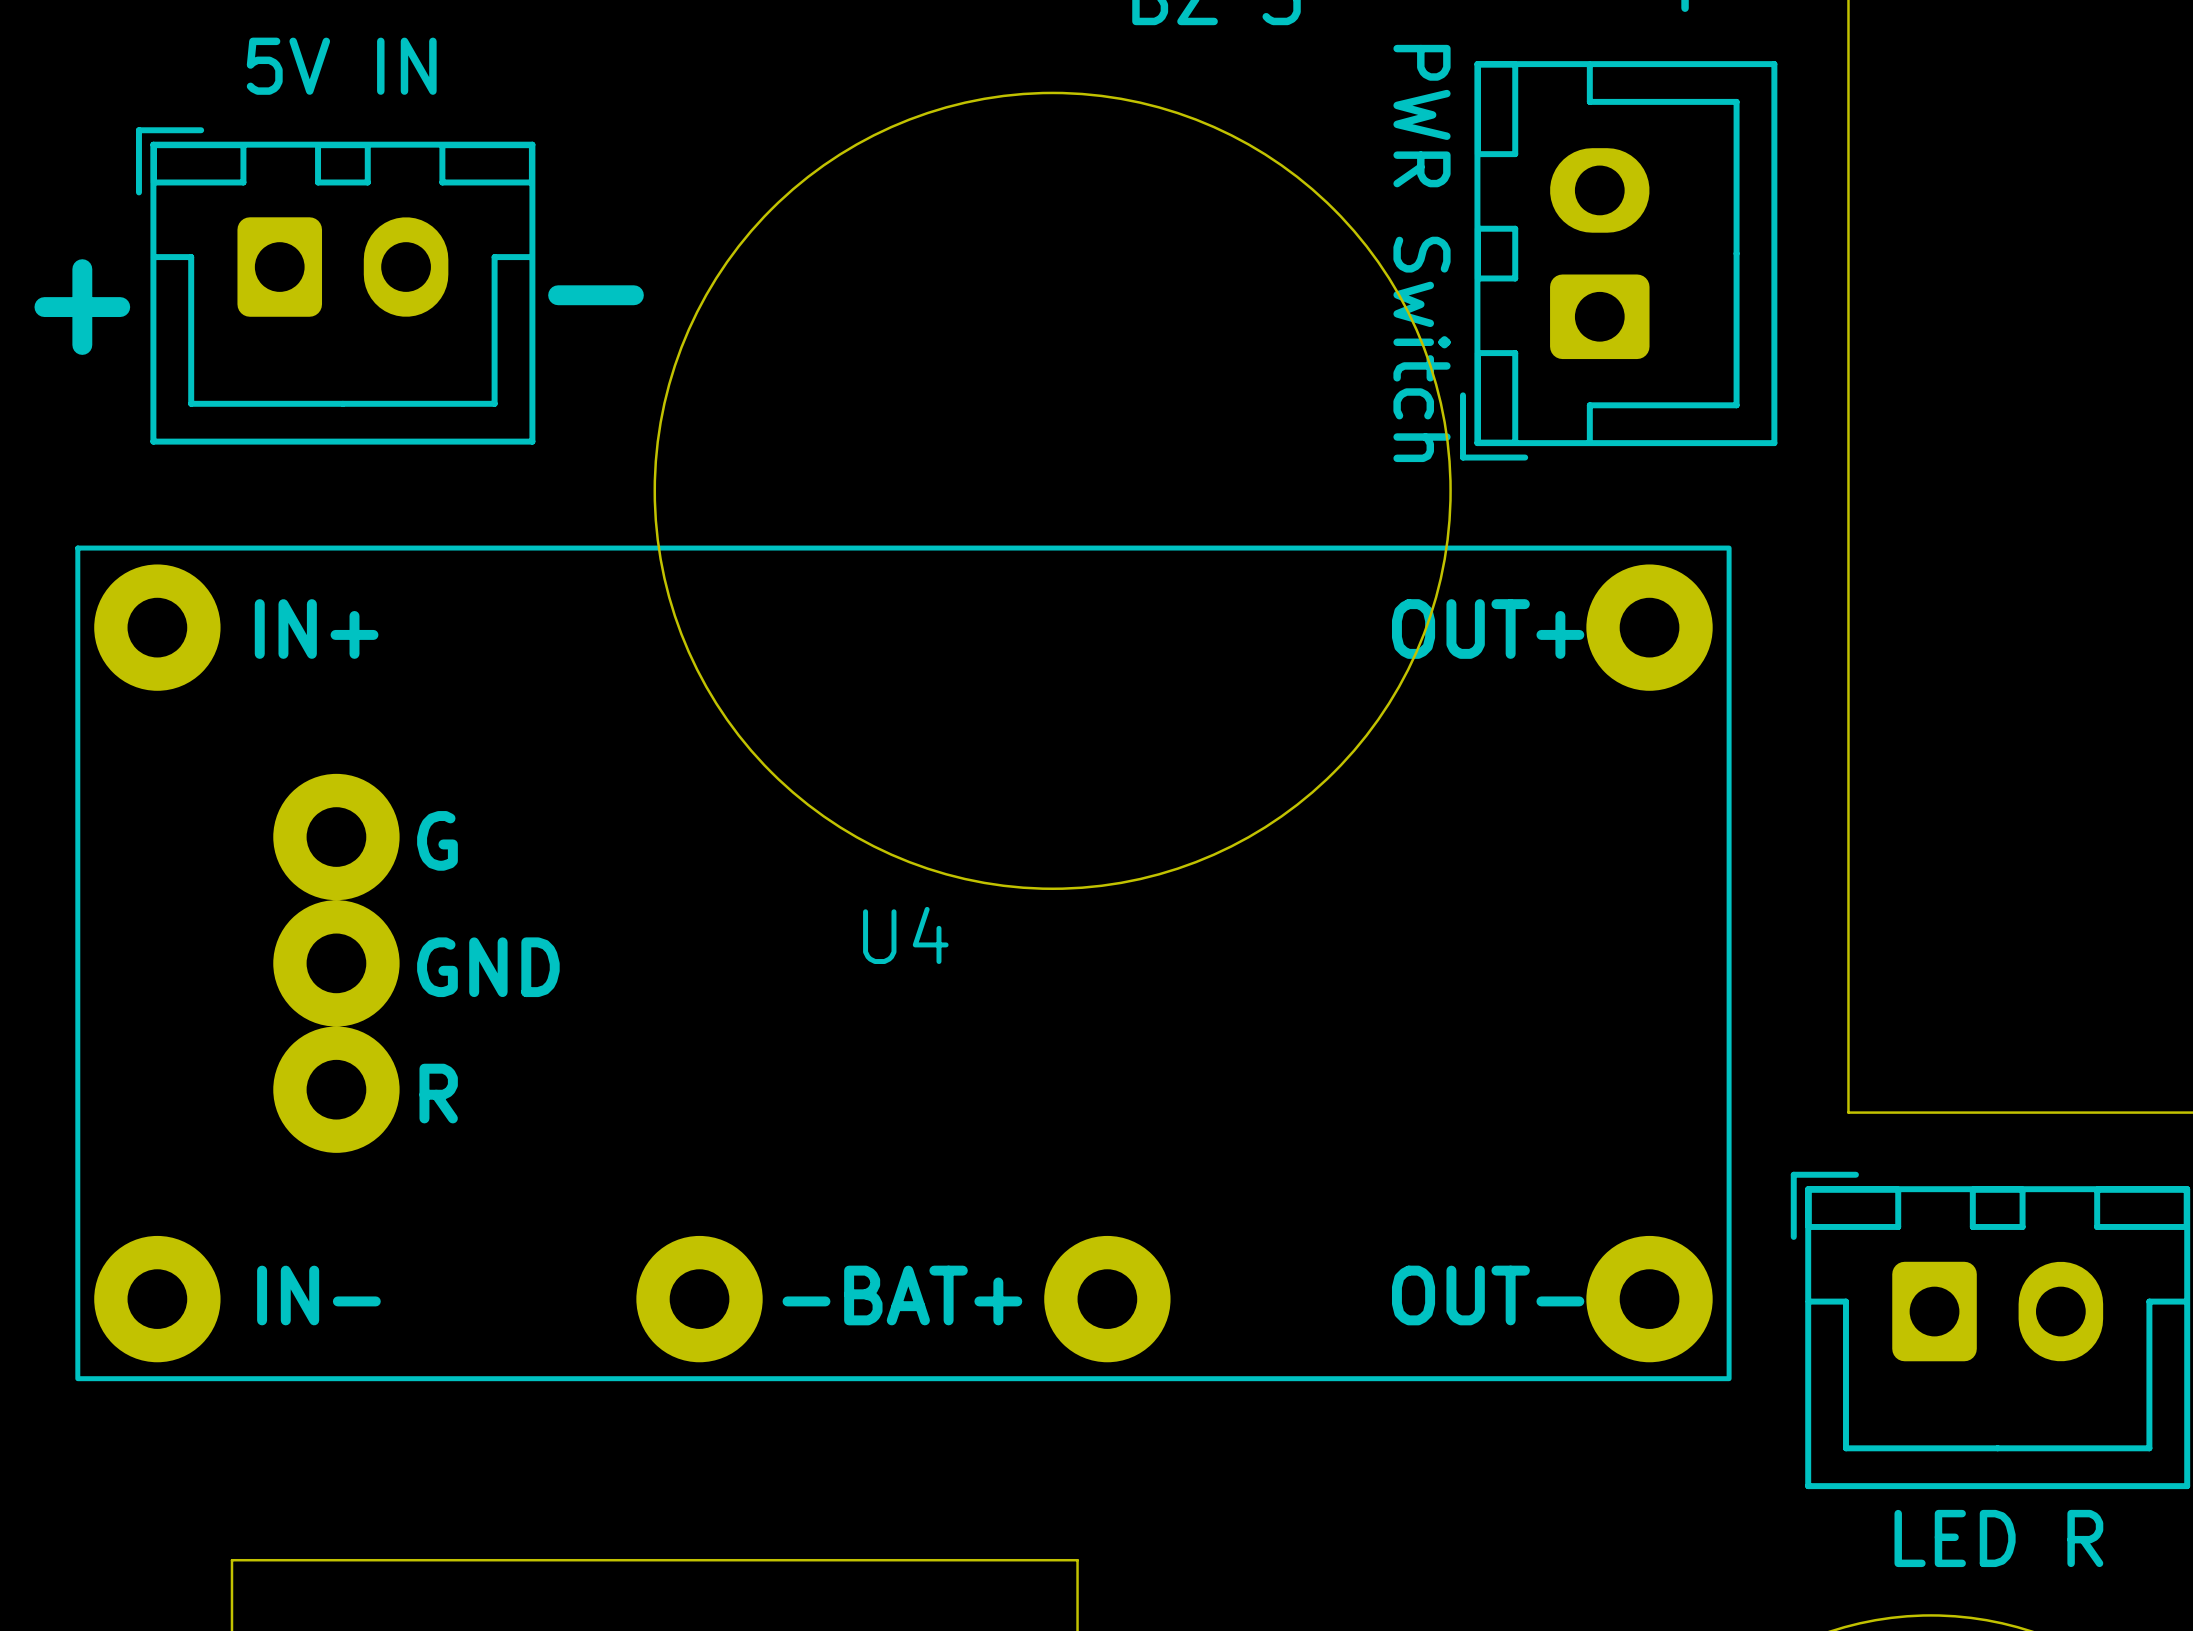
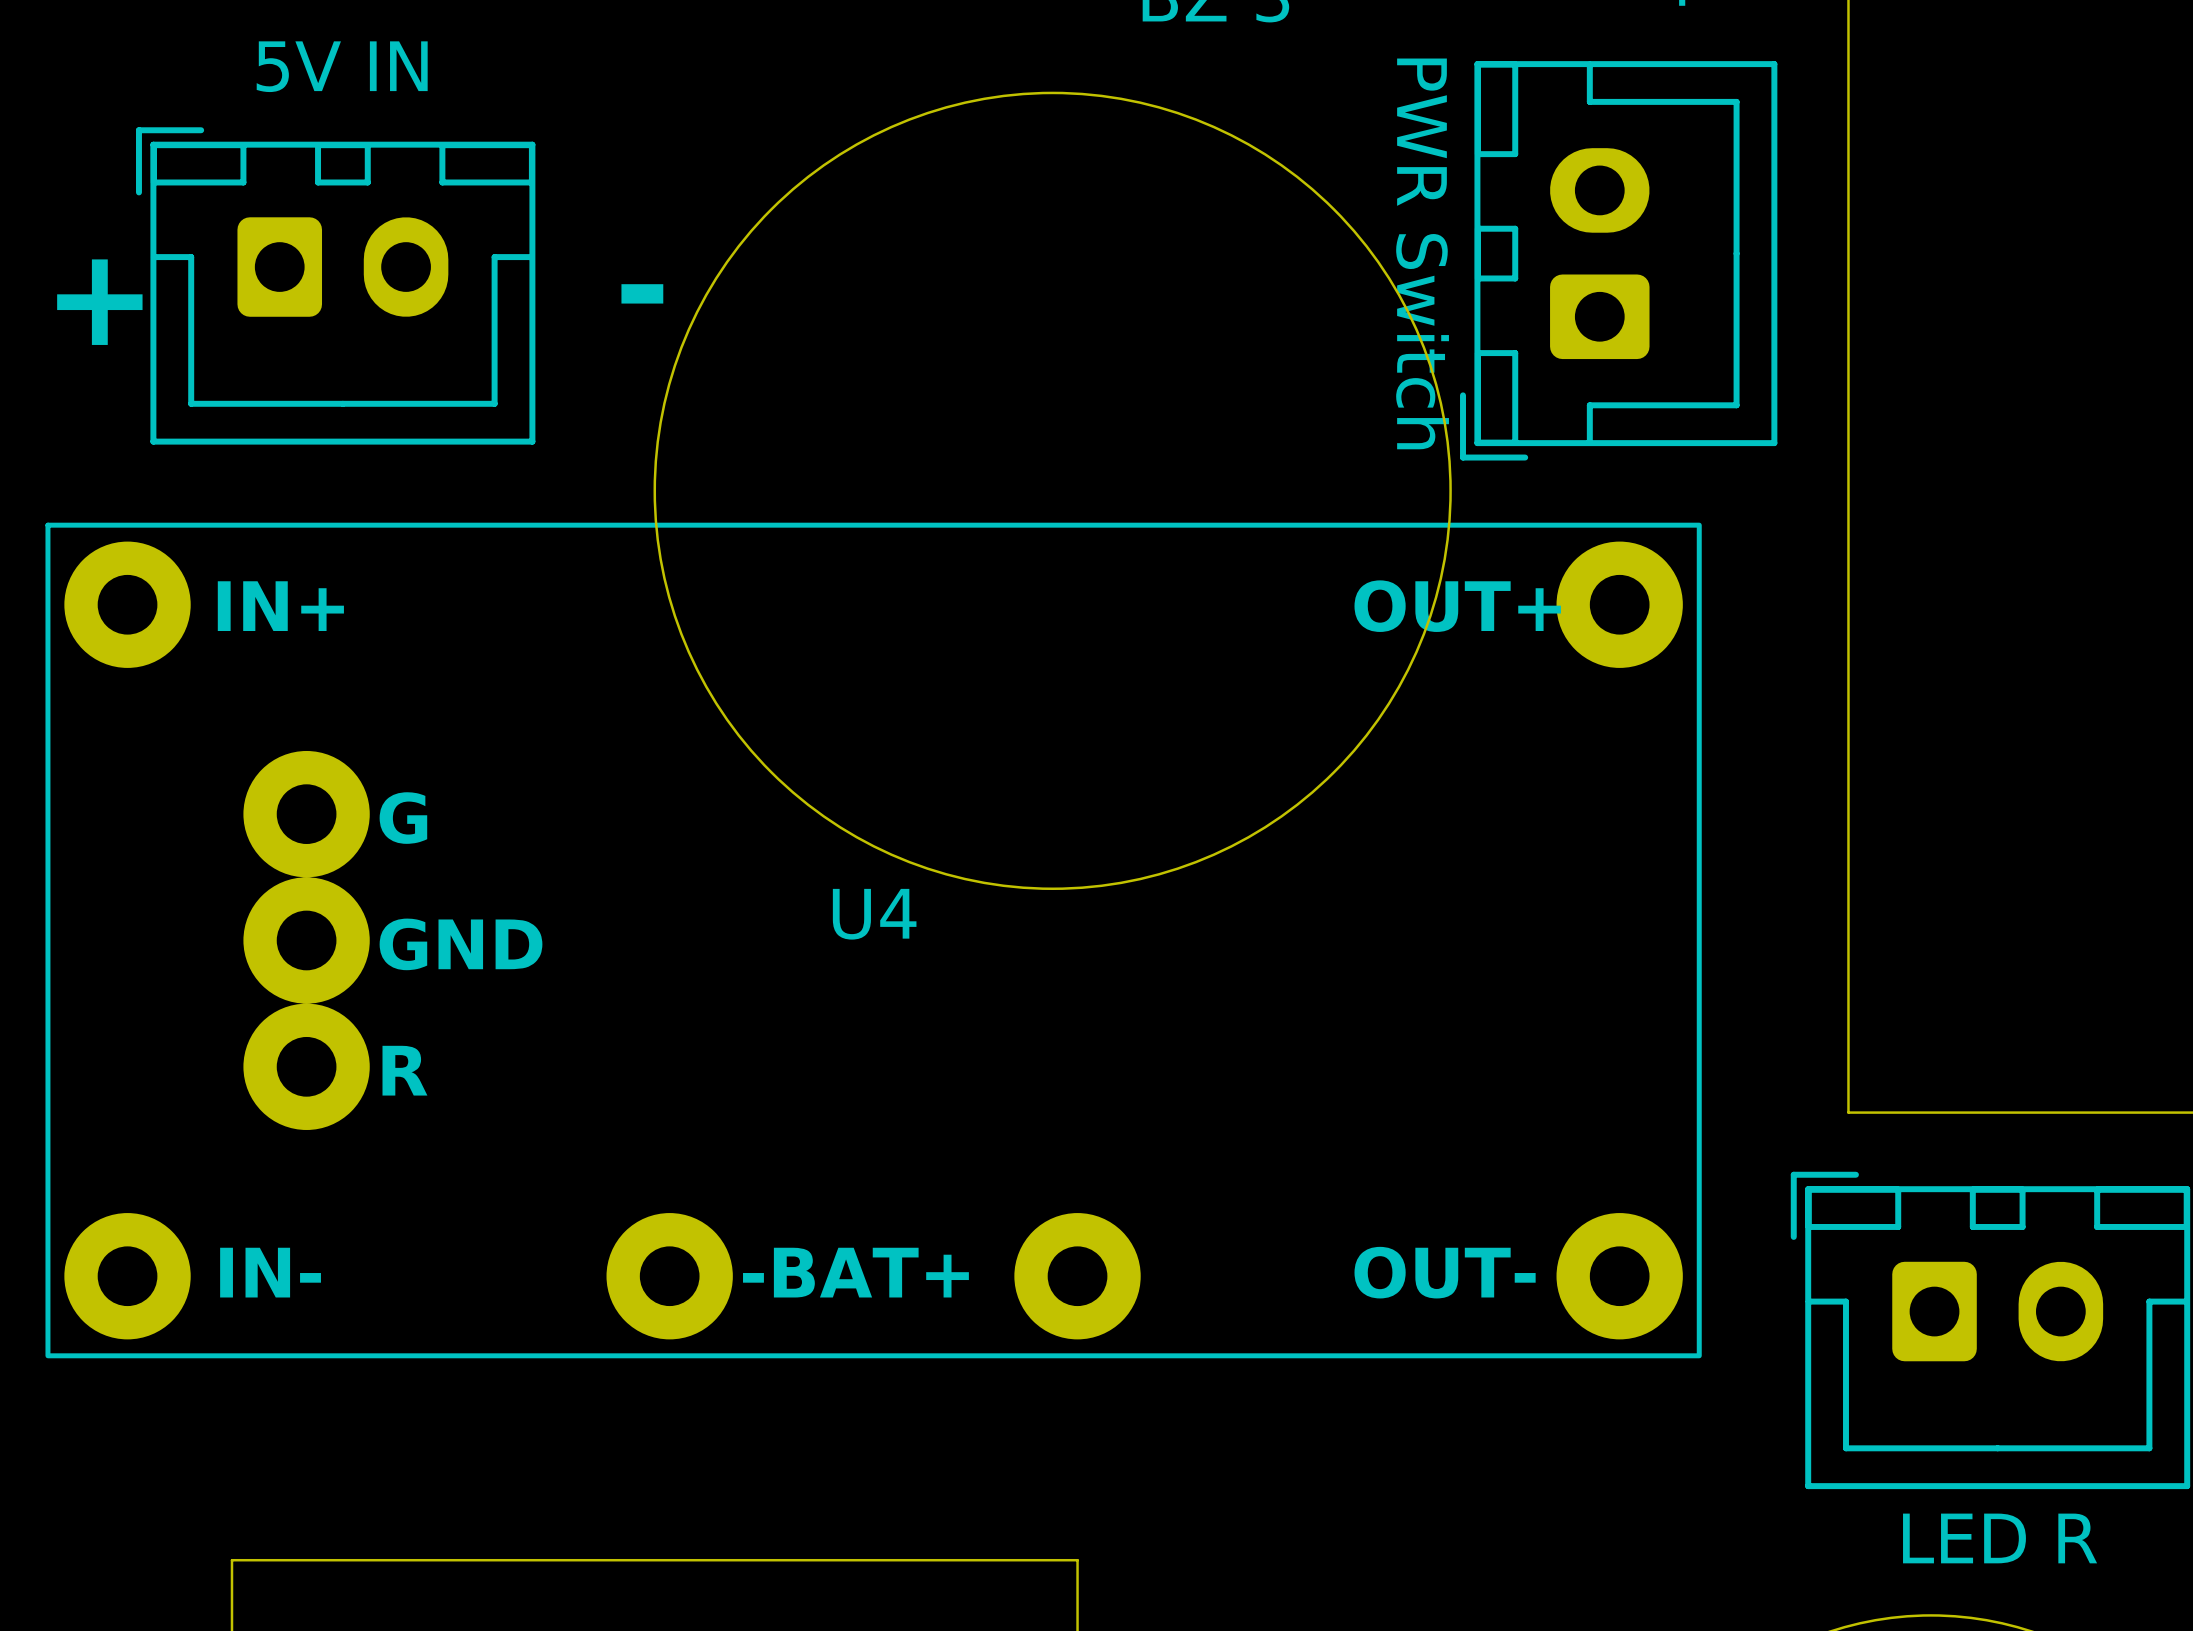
U4 position: (903, 963) -> (873, 940)

